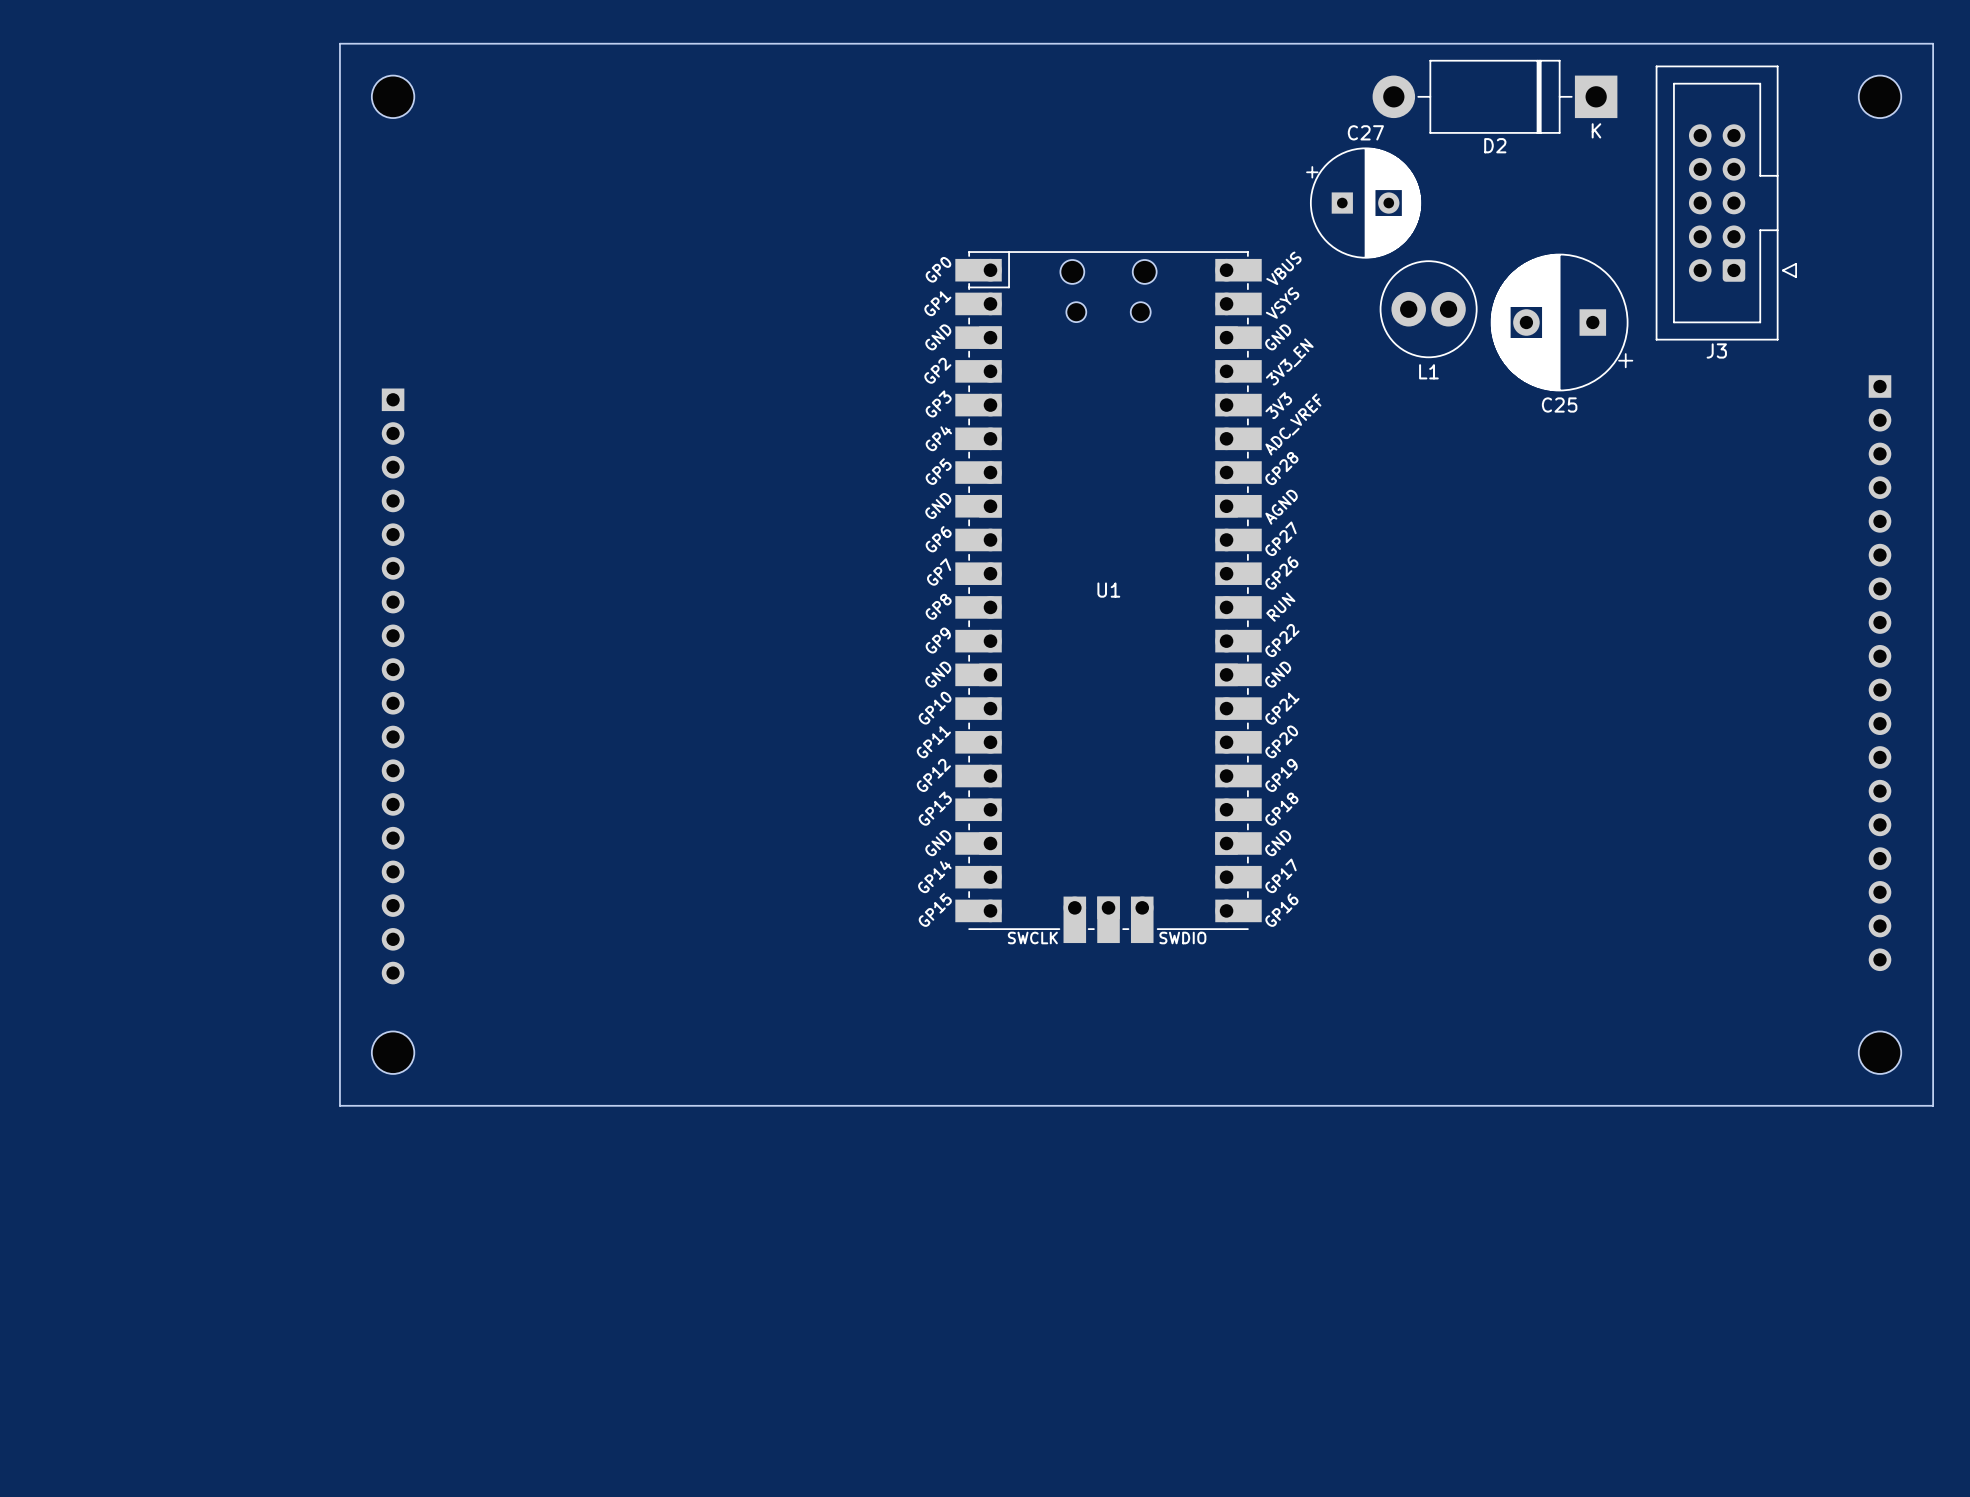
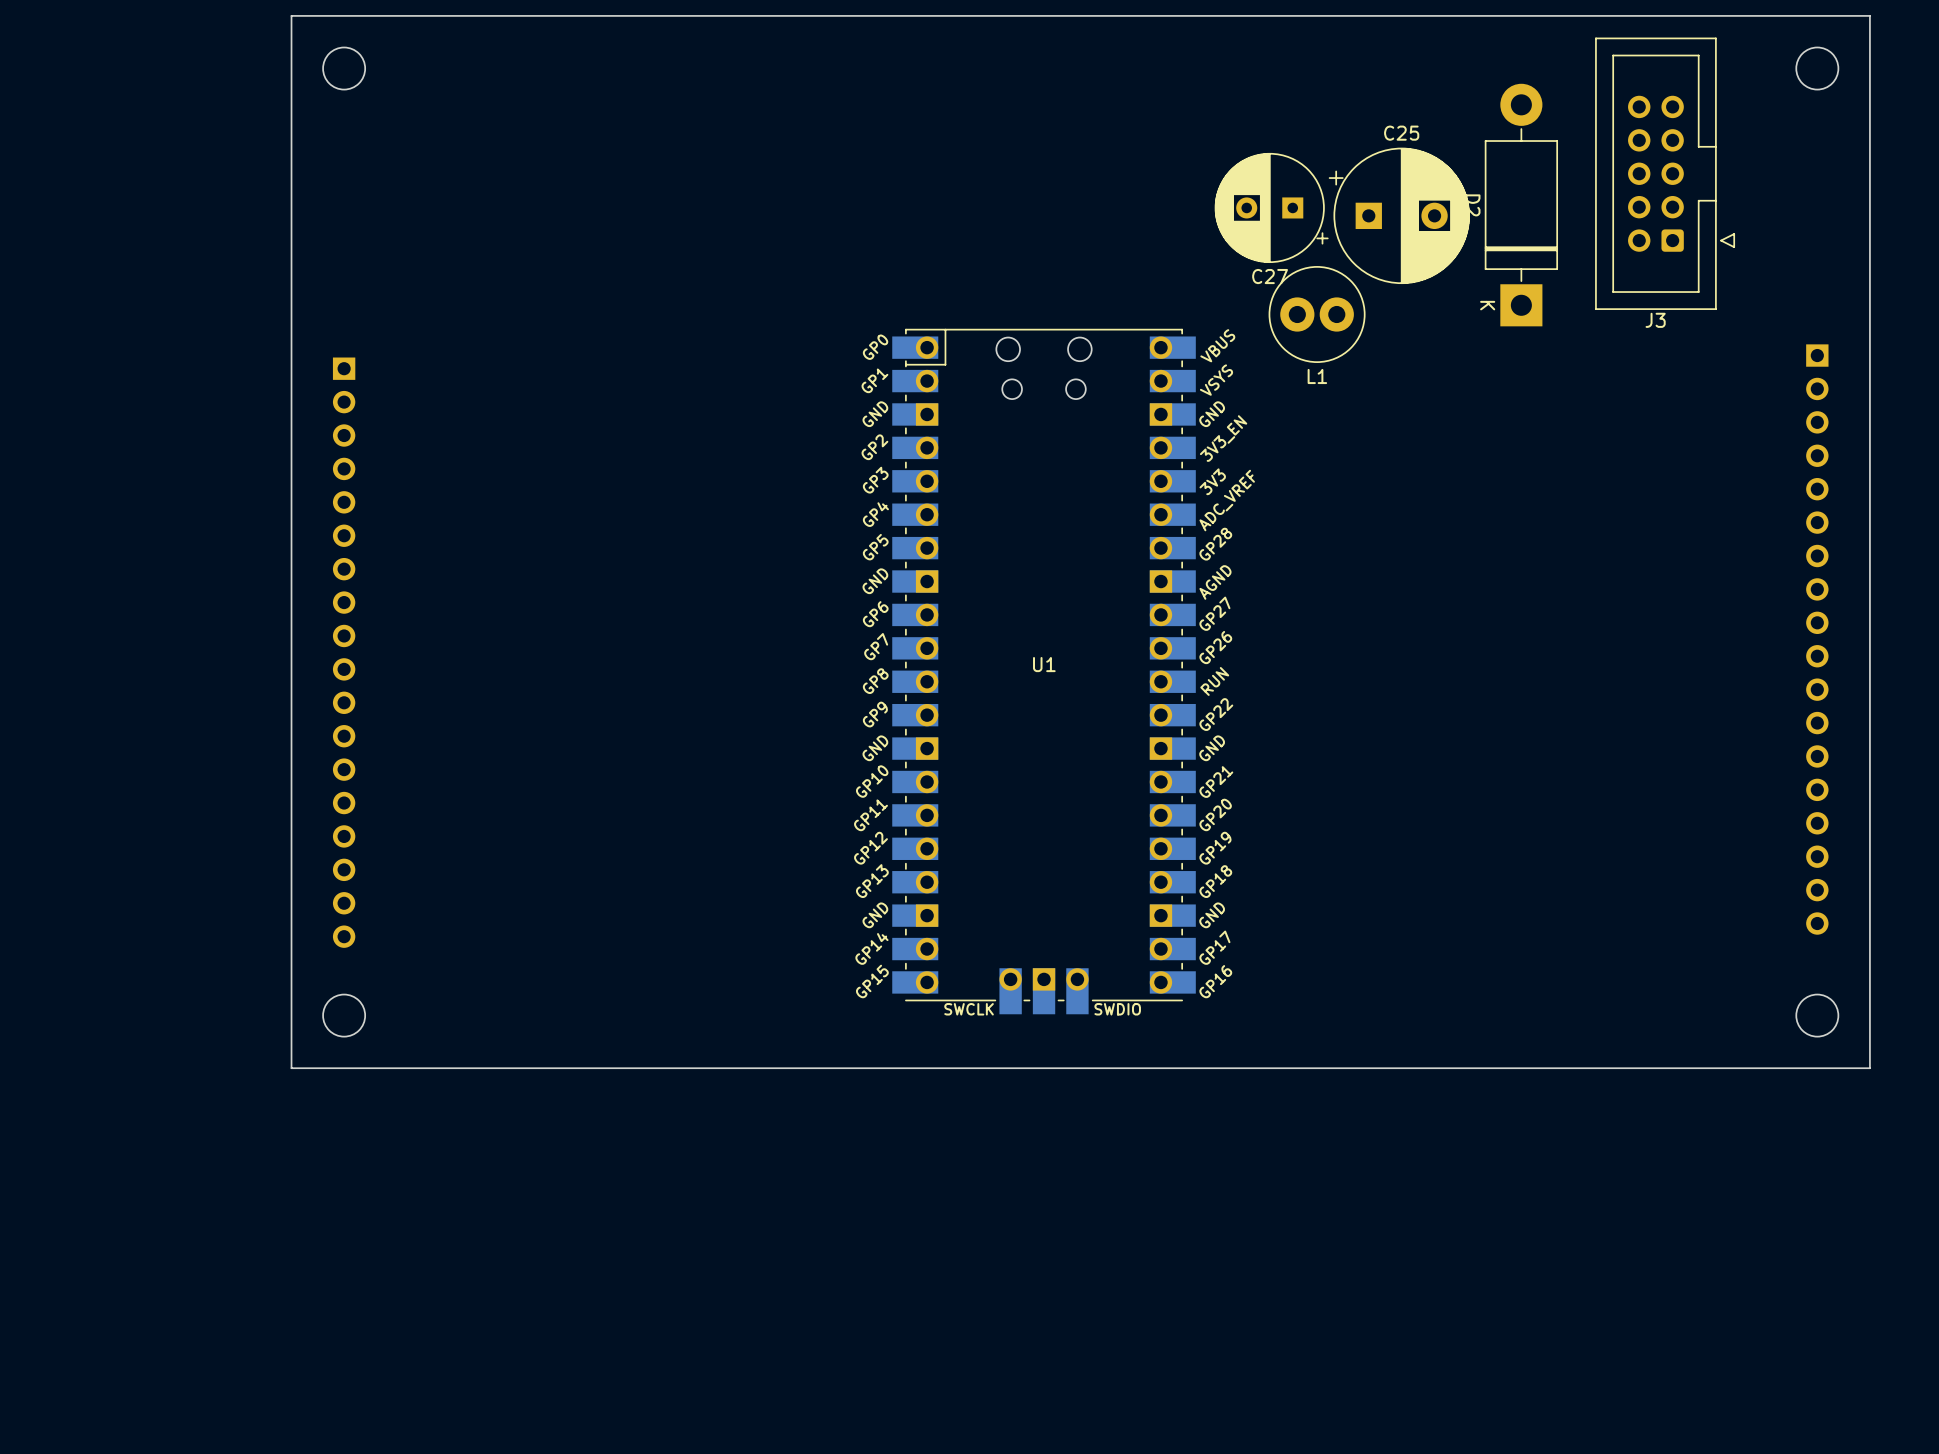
D2 rotation: 0° (1494, 96) -> 90° clockwise (1521, 205)
D2 position: (1494, 96) -> (1521, 205)
C27 rotation: 0° (1363, 203) -> 180° (1271, 207)
L1 position: (1428, 309) -> (1317, 314)
C25 rotation: 0° (1562, 322) -> 180° (1399, 215)
C25 position: (1562, 322) -> (1399, 215)
U1 position: (1108, 597) -> (1044, 671)

